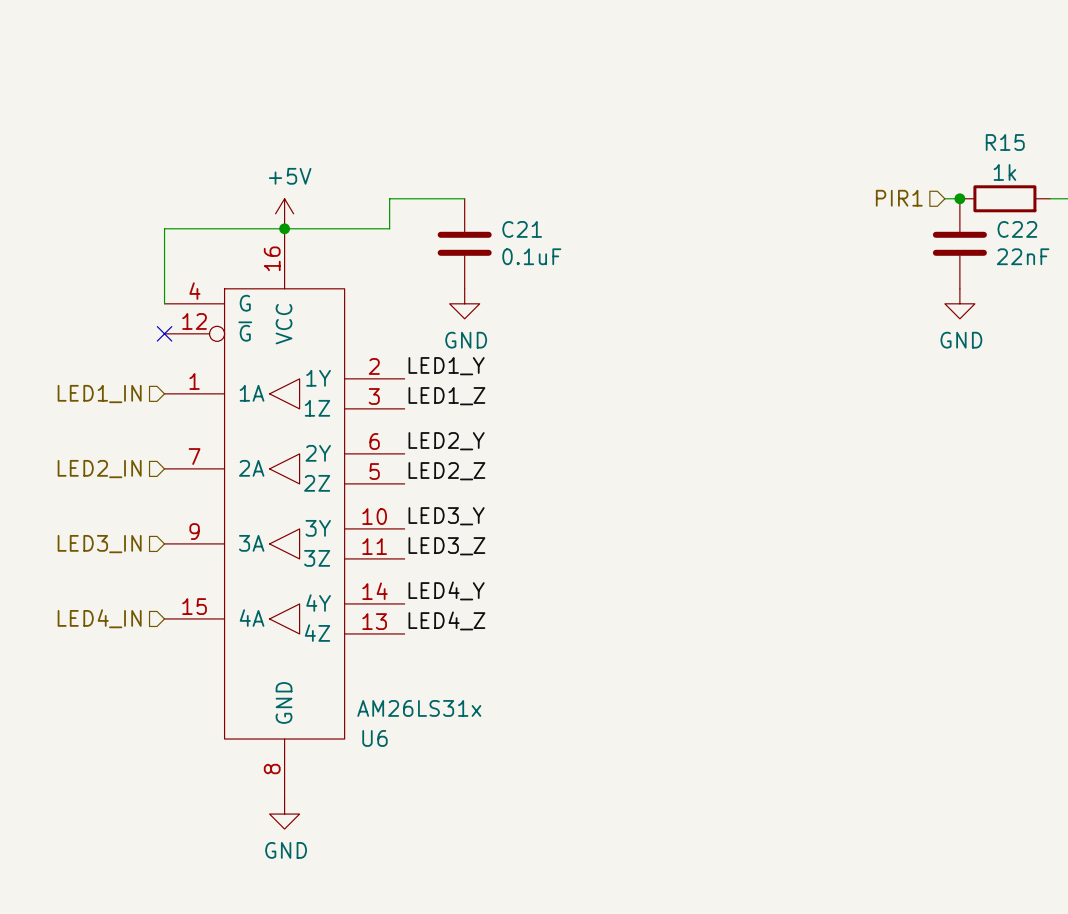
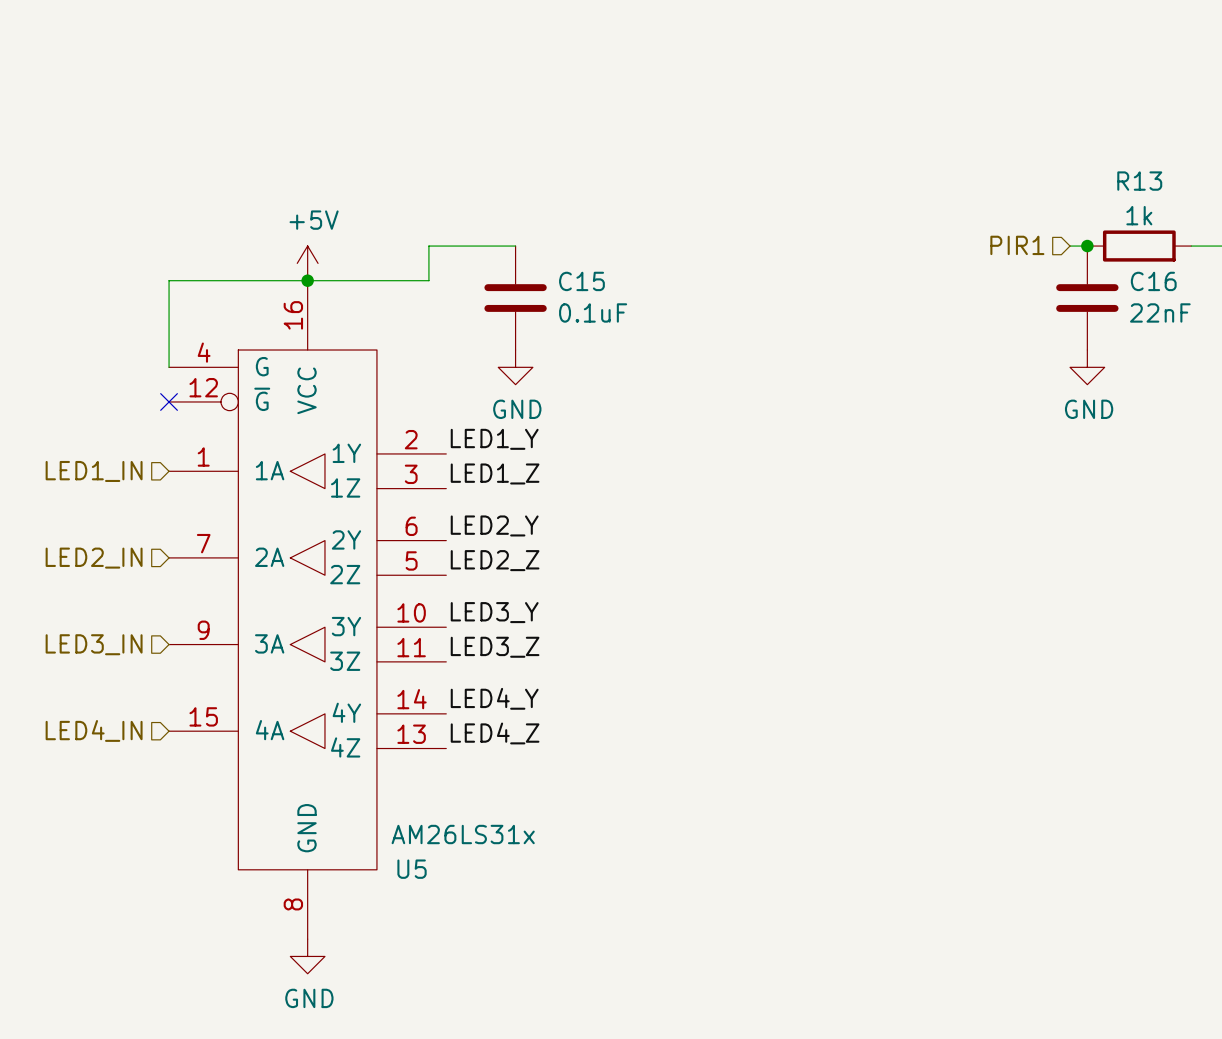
R15 name: R15 (1005, 142) -> R13 (1139, 181)
C21 name: C21 (522, 229) -> C15 (581, 281)
C22 name: C22 (1017, 229) -> C16 (1153, 281)
U6 name: U6 (374, 738) -> U5 (412, 869)

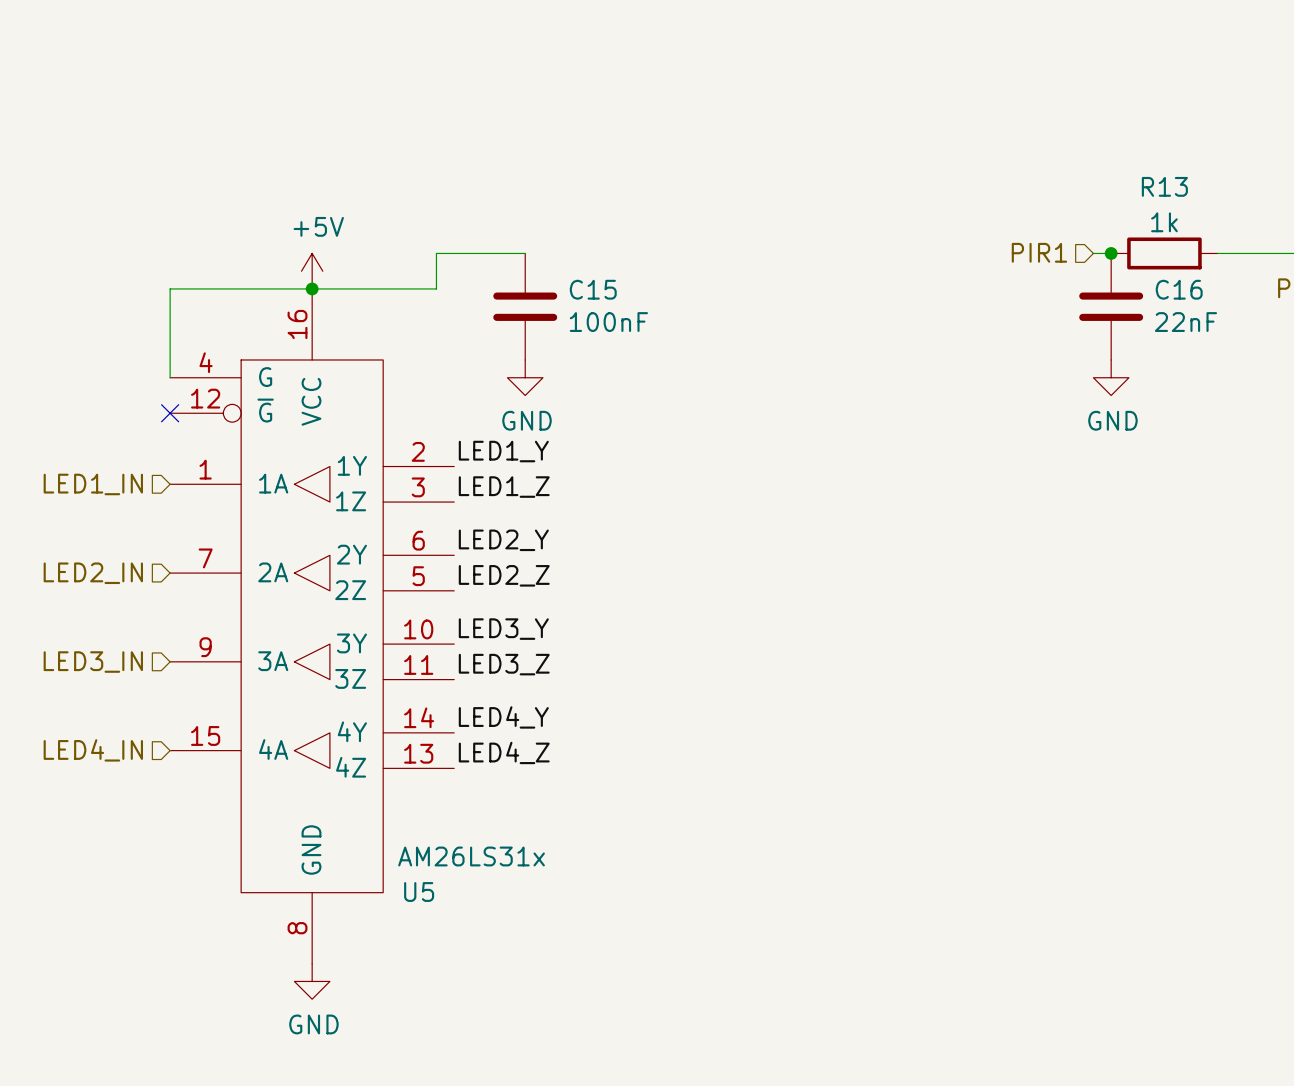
C15 value: 0.1uF (593, 312) -> 100nF (608, 322)

